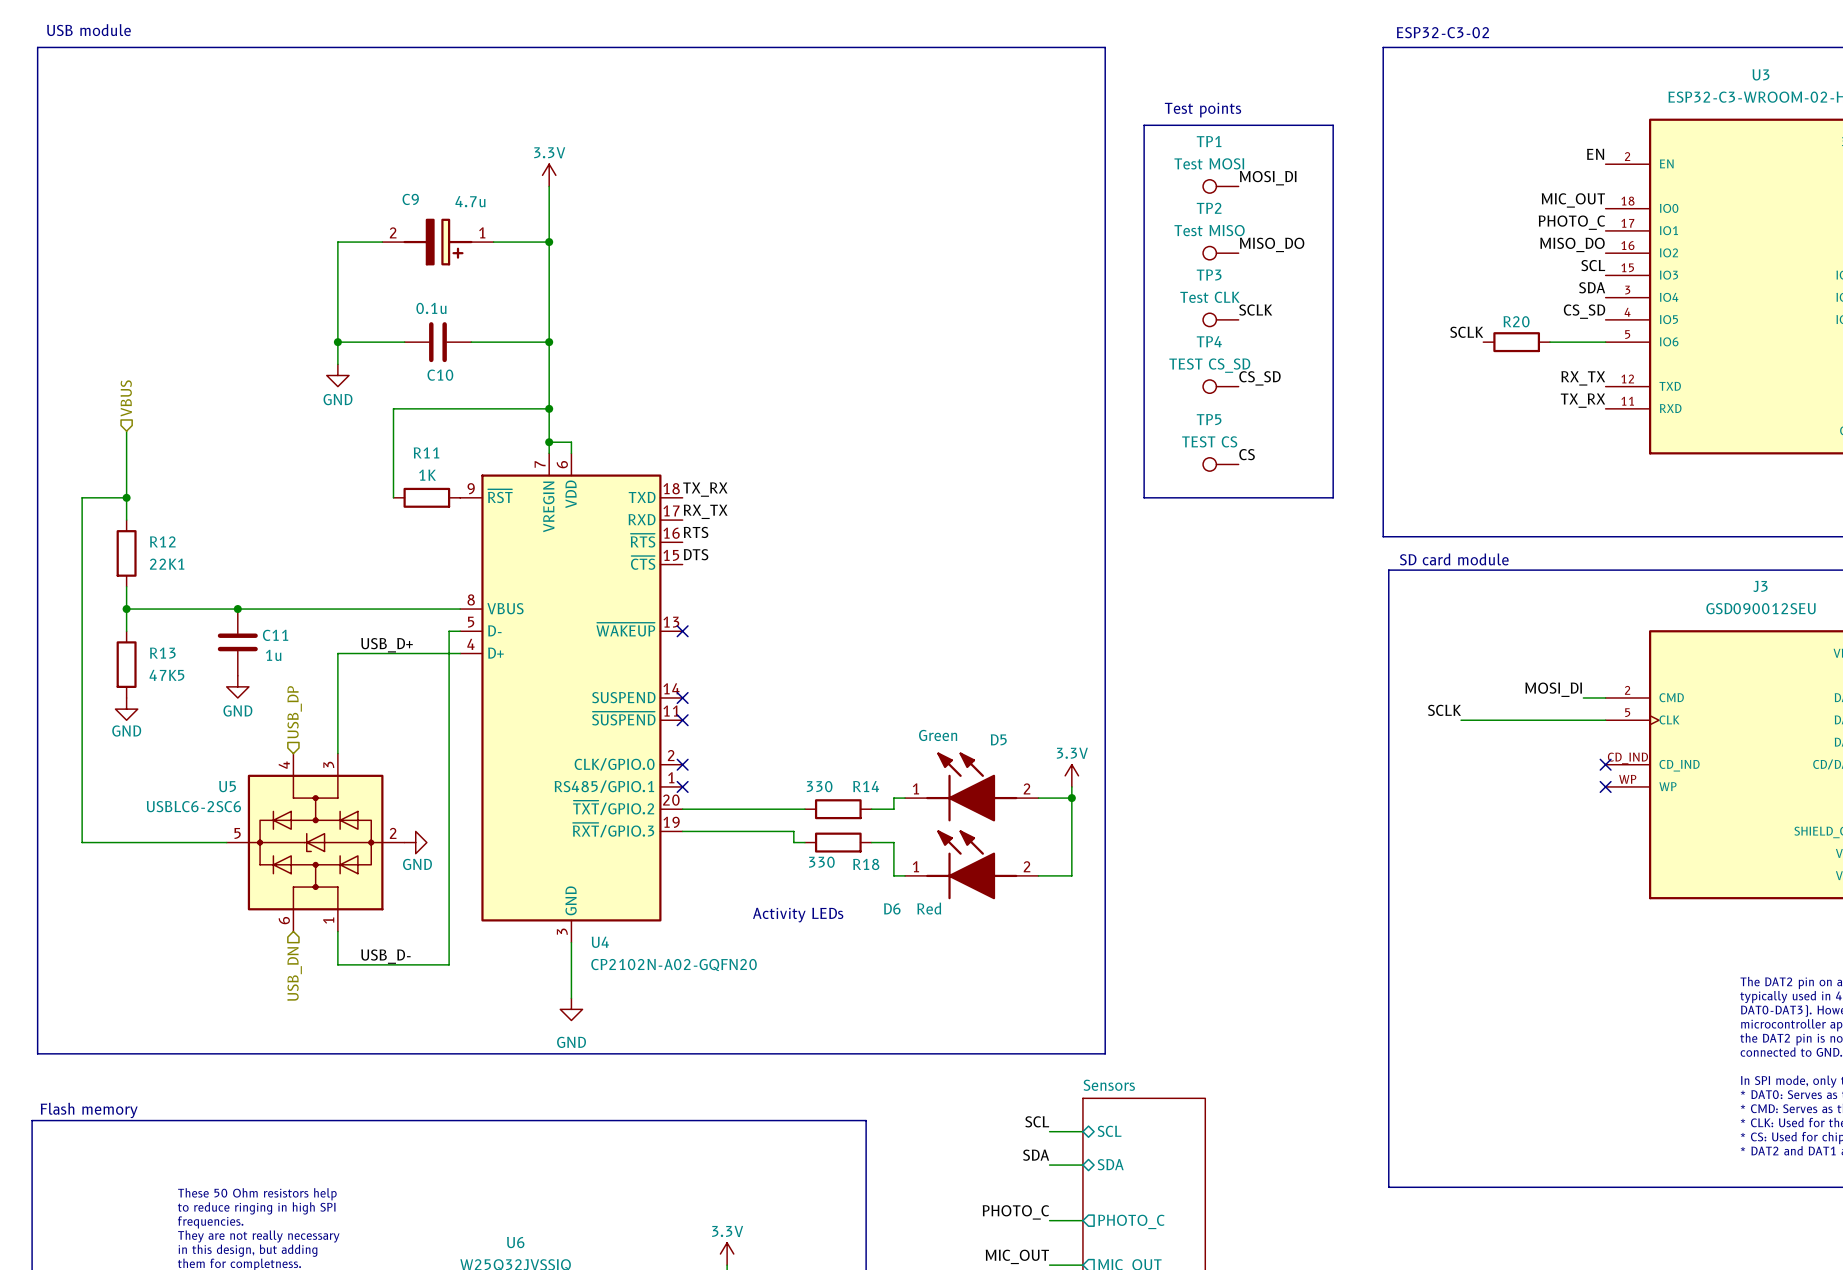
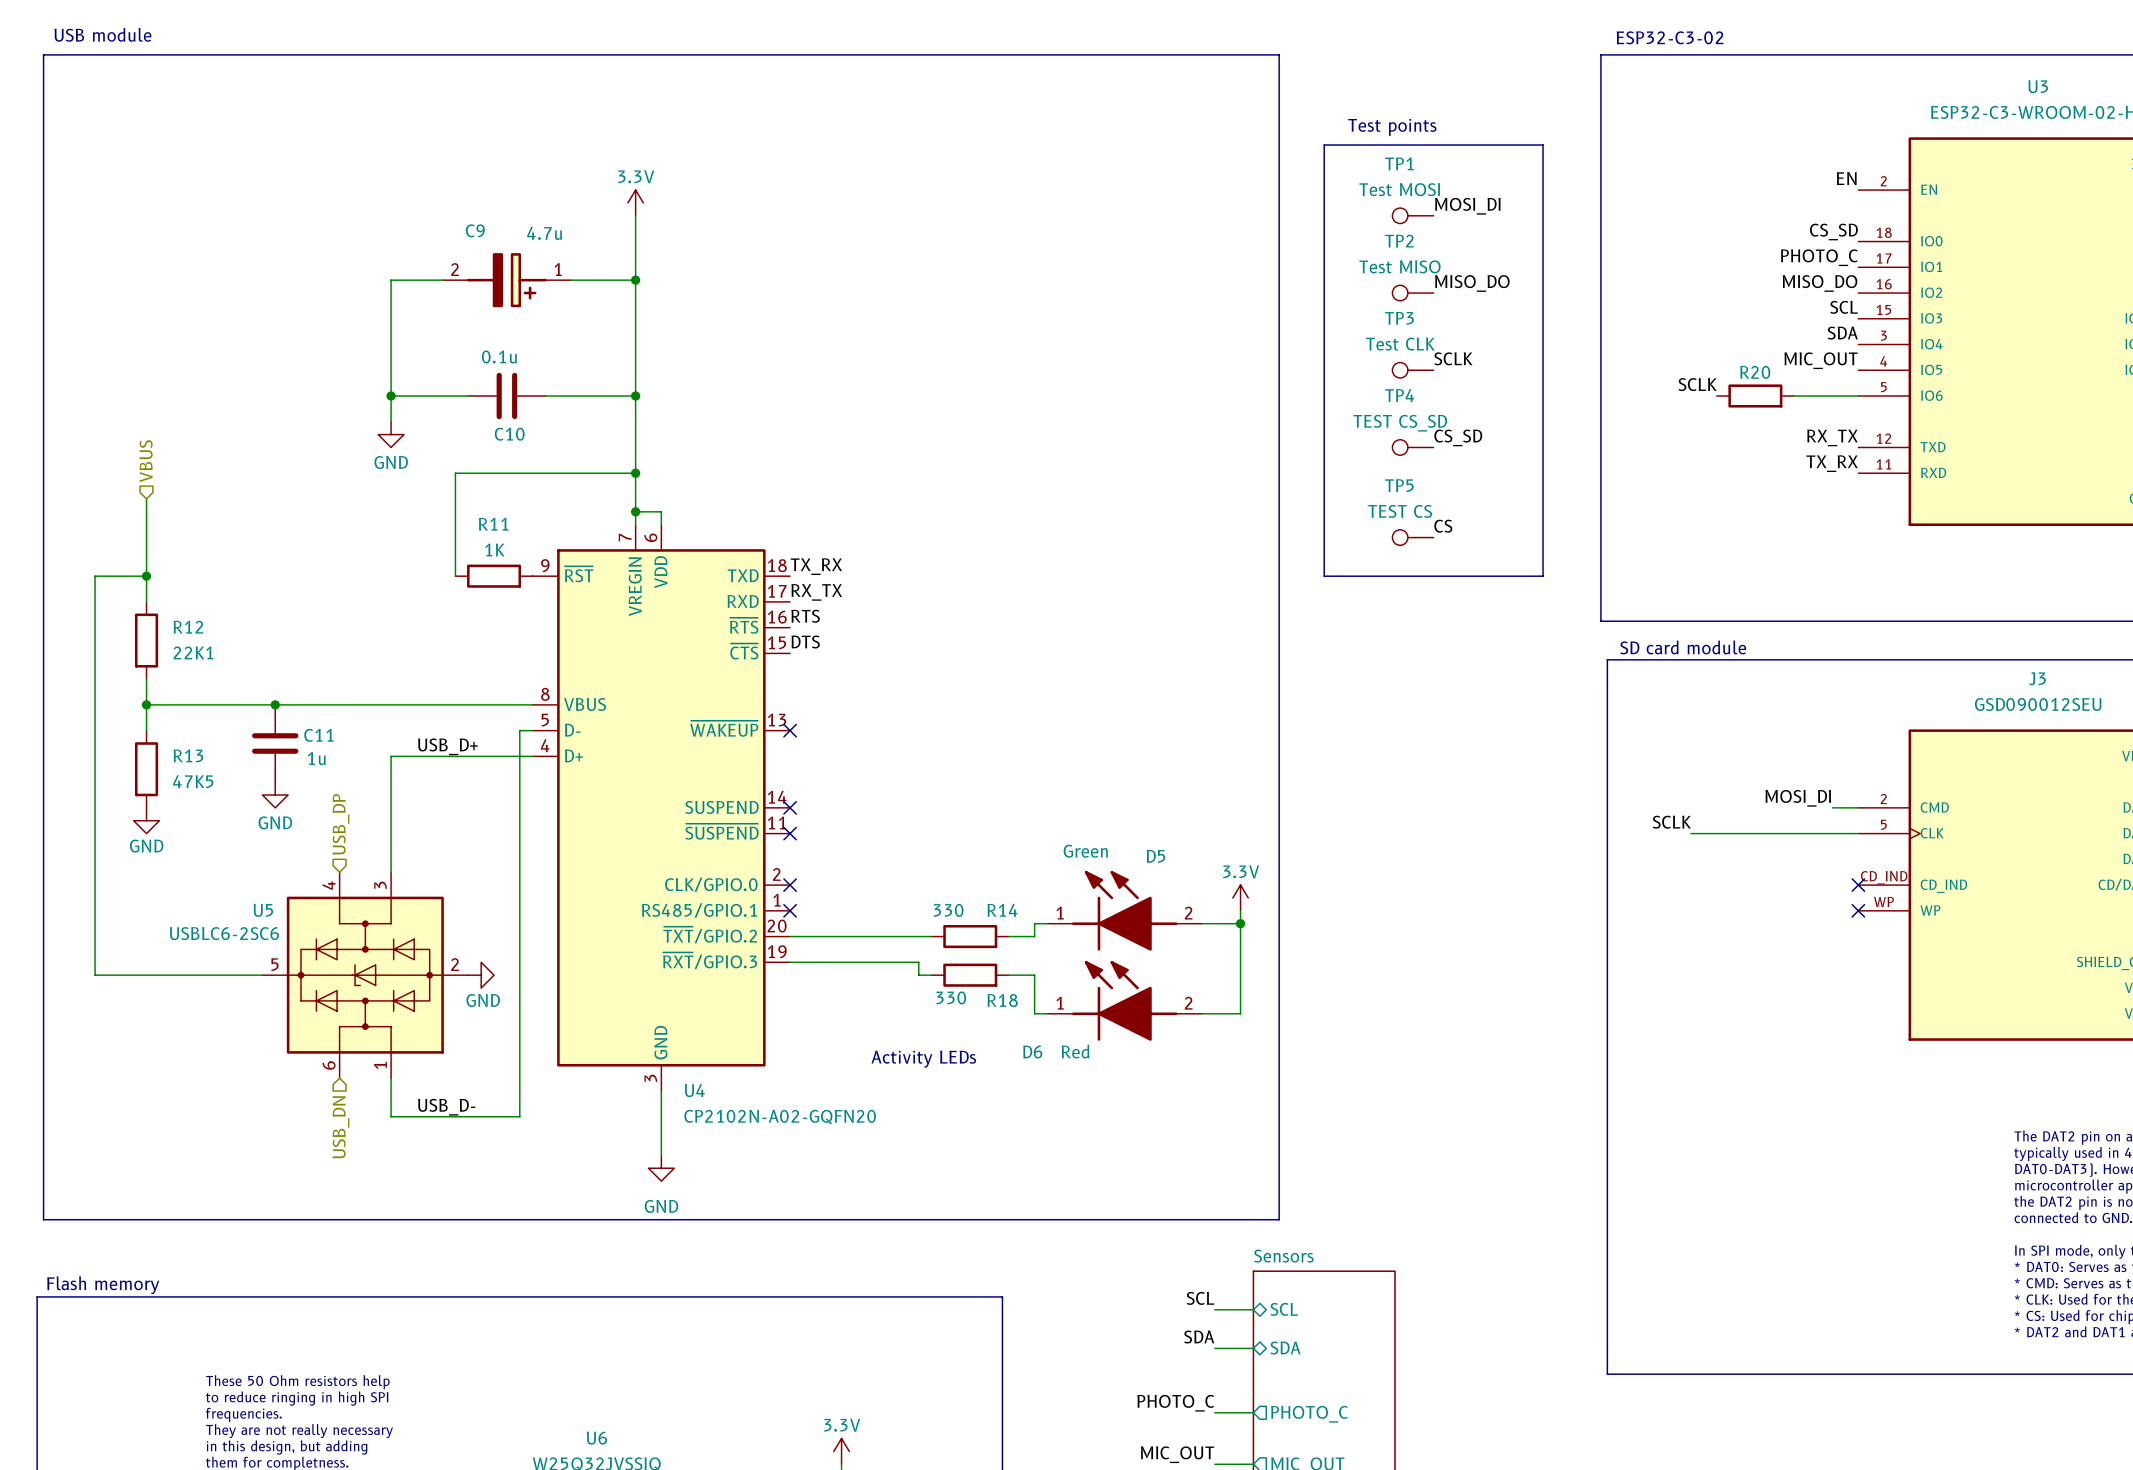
label: MIC_OUT (1573, 200) -> CS_SD (1833, 232)
label: CS_SD (1584, 311) -> MIC_OUT (1821, 360)

